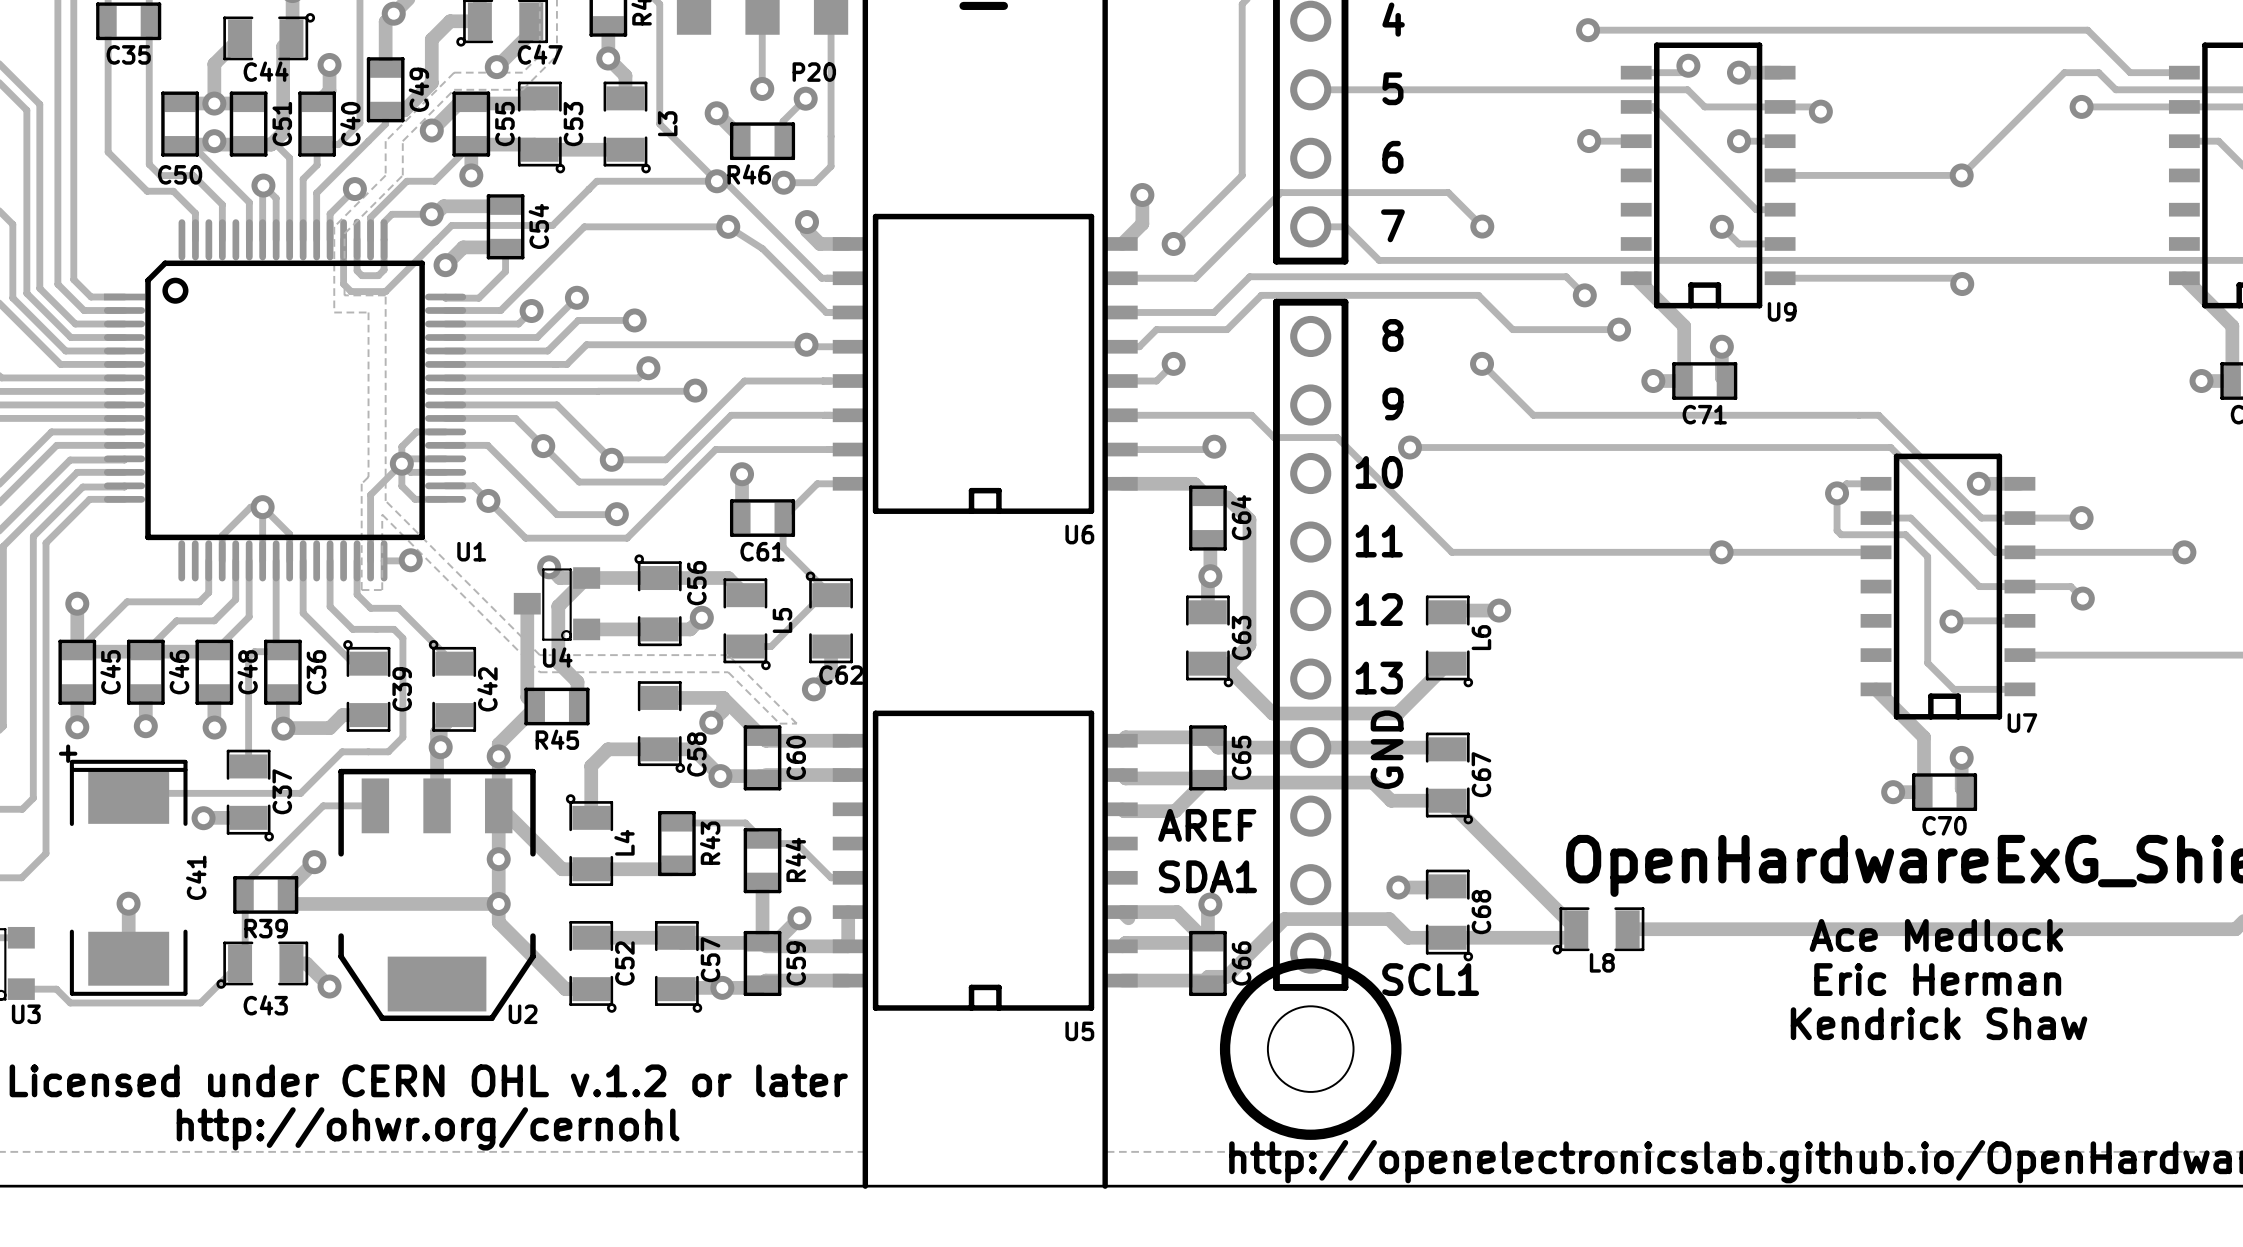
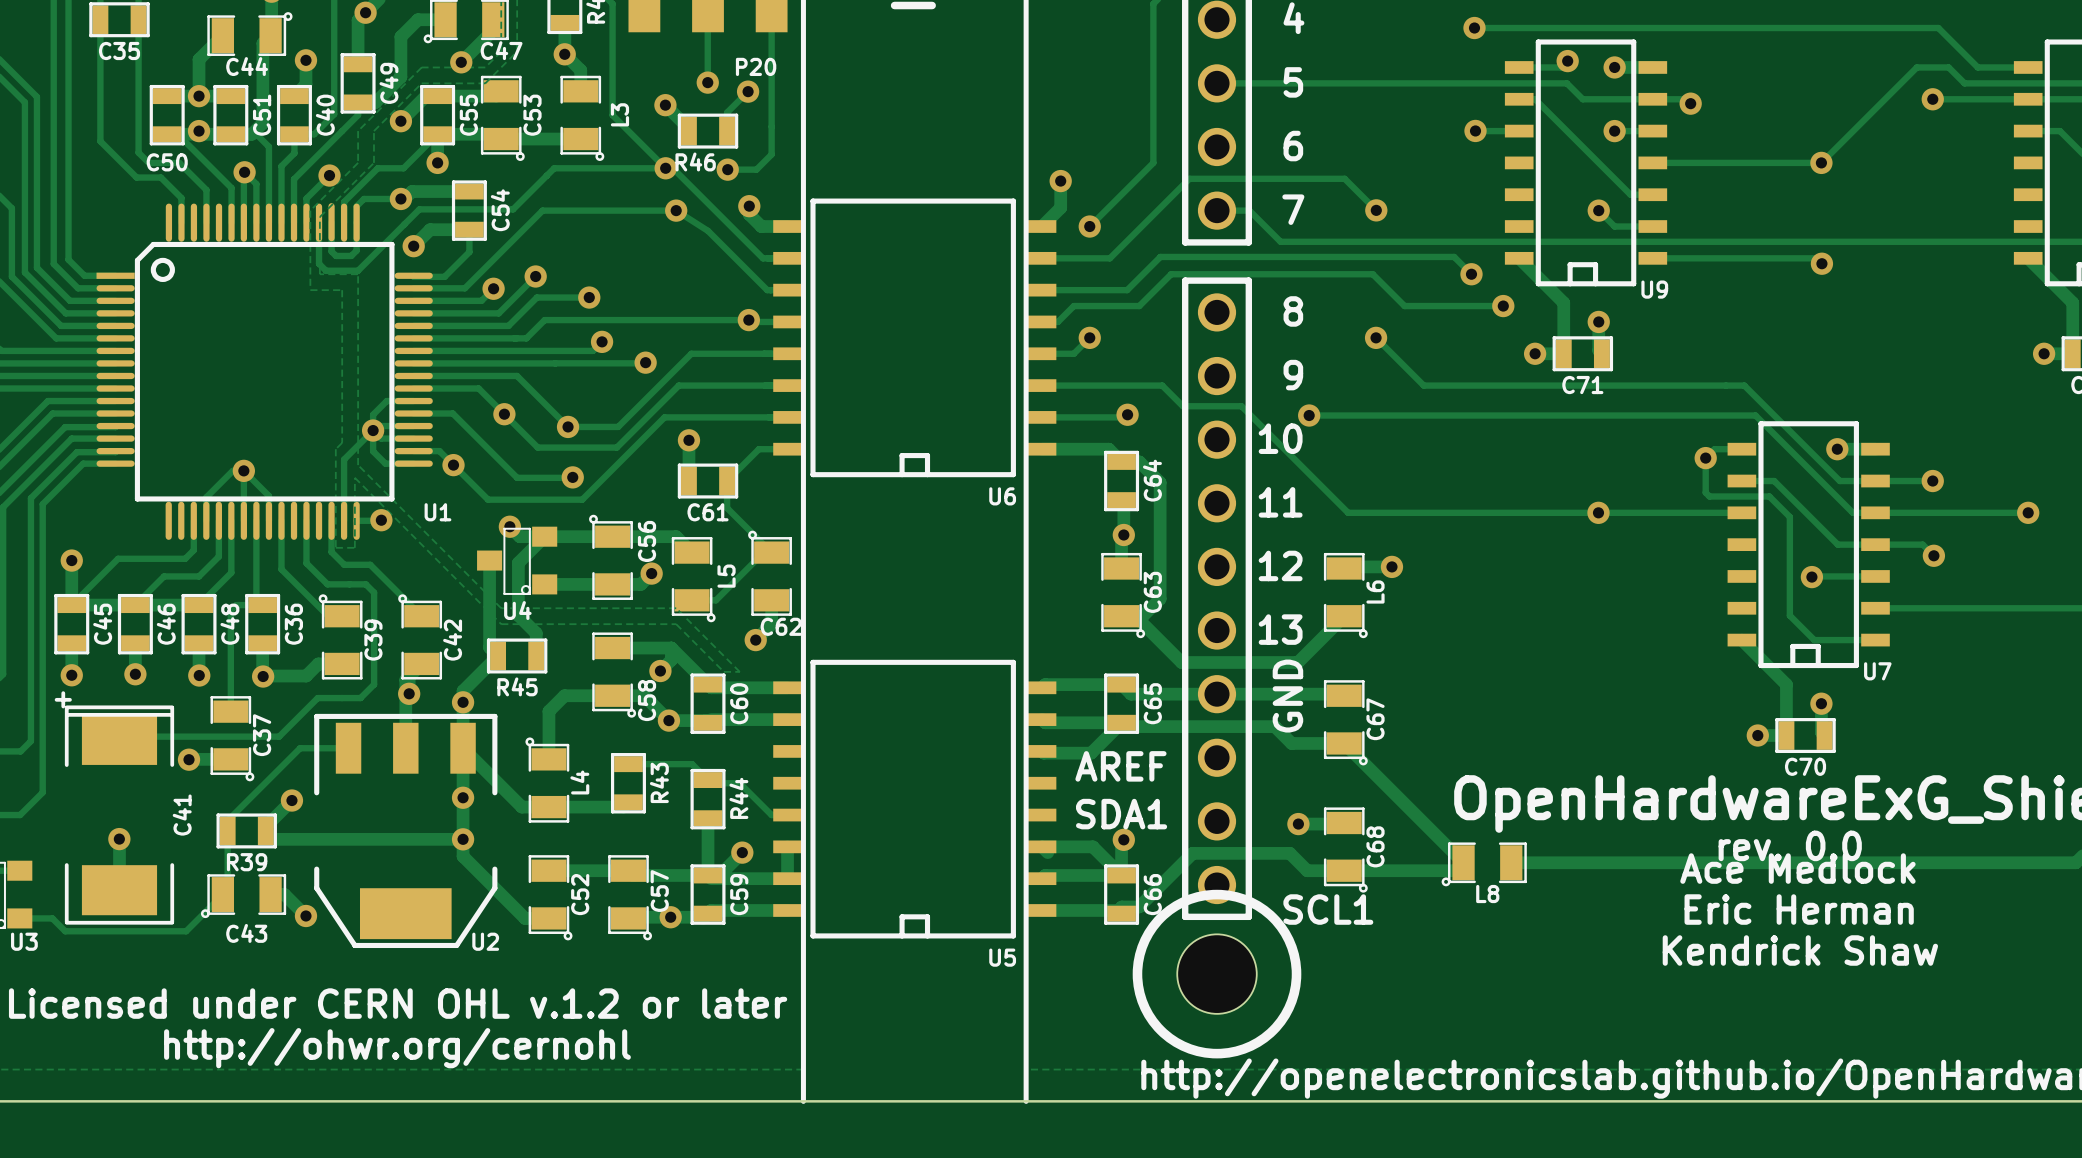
text: none -> rev. 0.0 (1790, 845)

